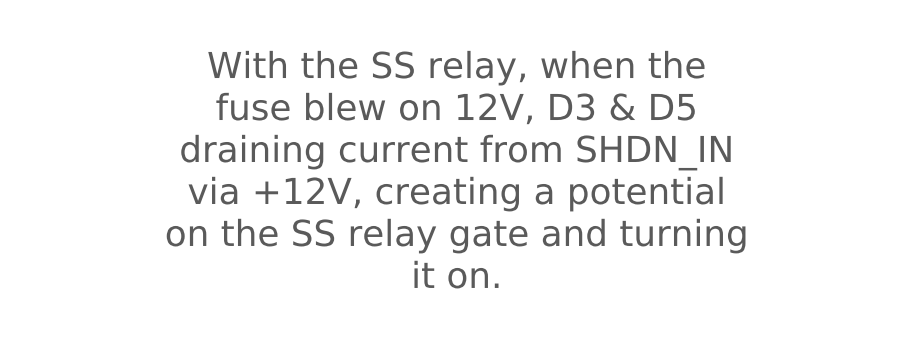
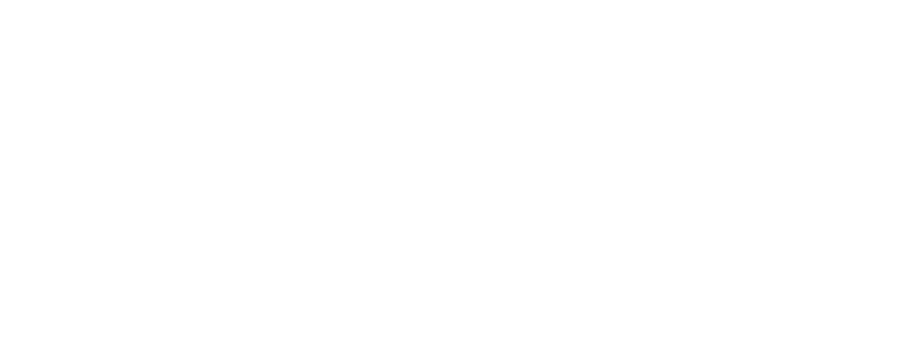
text: With the SS relay, when the (456, 68) -> none
text: fuse blew on 12V, D3 & D5 (455, 108) -> none
text: draining current from SHDN_IN (455, 152) -> none
text: via +12V, creating a potential (455, 194) -> none
text: on the SS relay gate and turning (456, 236) -> none
text: it on. (456, 274) -> none

